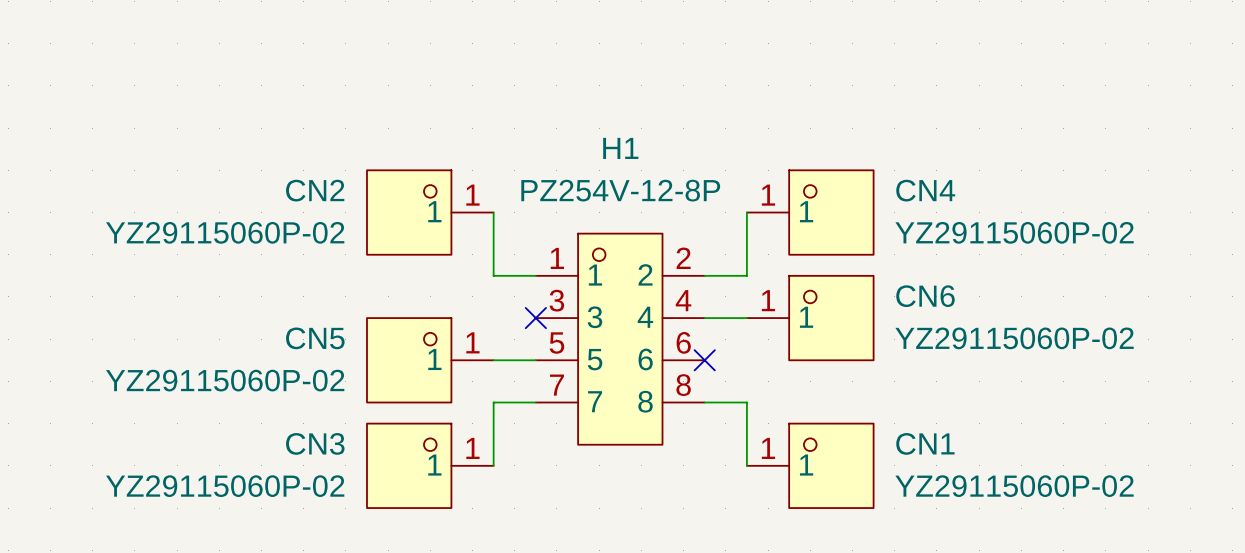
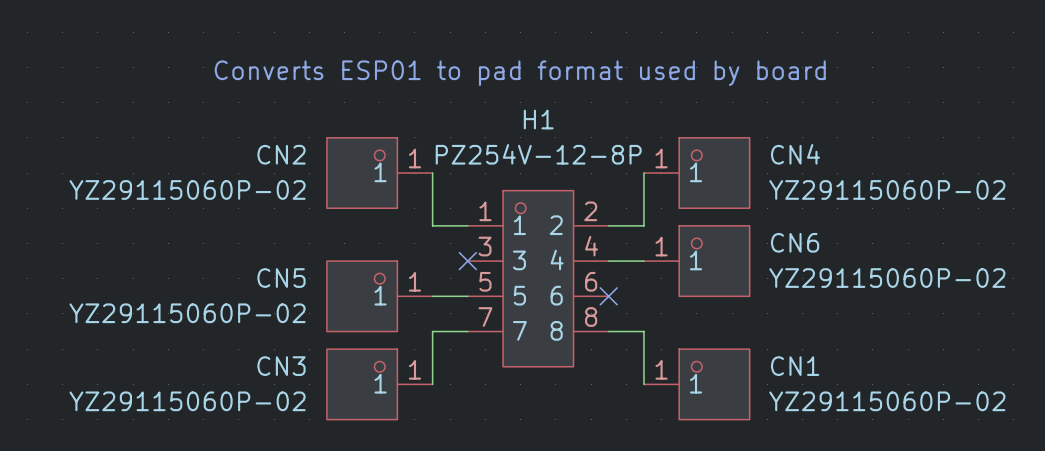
text: none -> Converts ESP01 to pad format used by board (520, 73)

